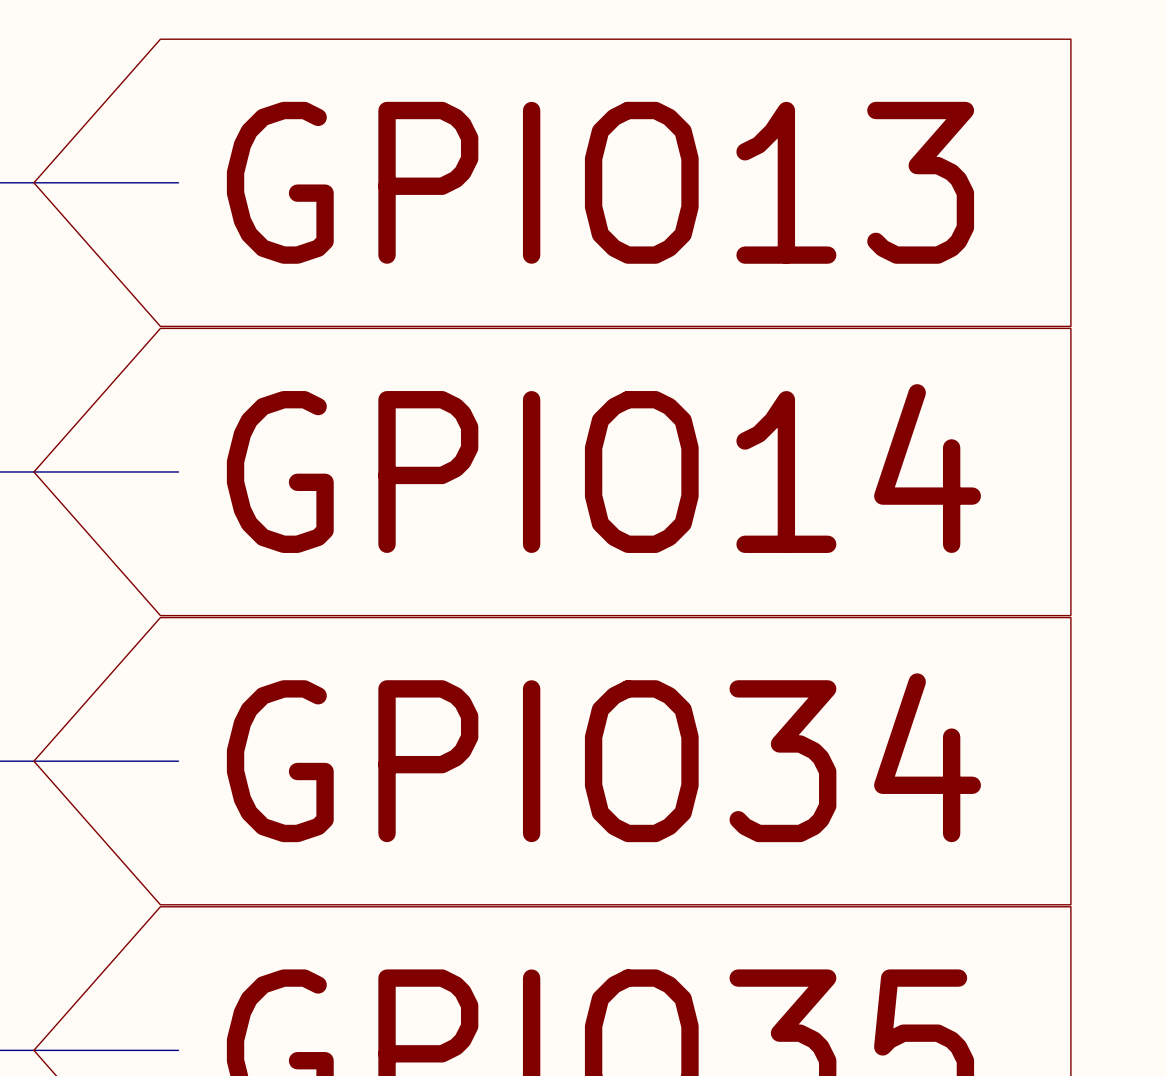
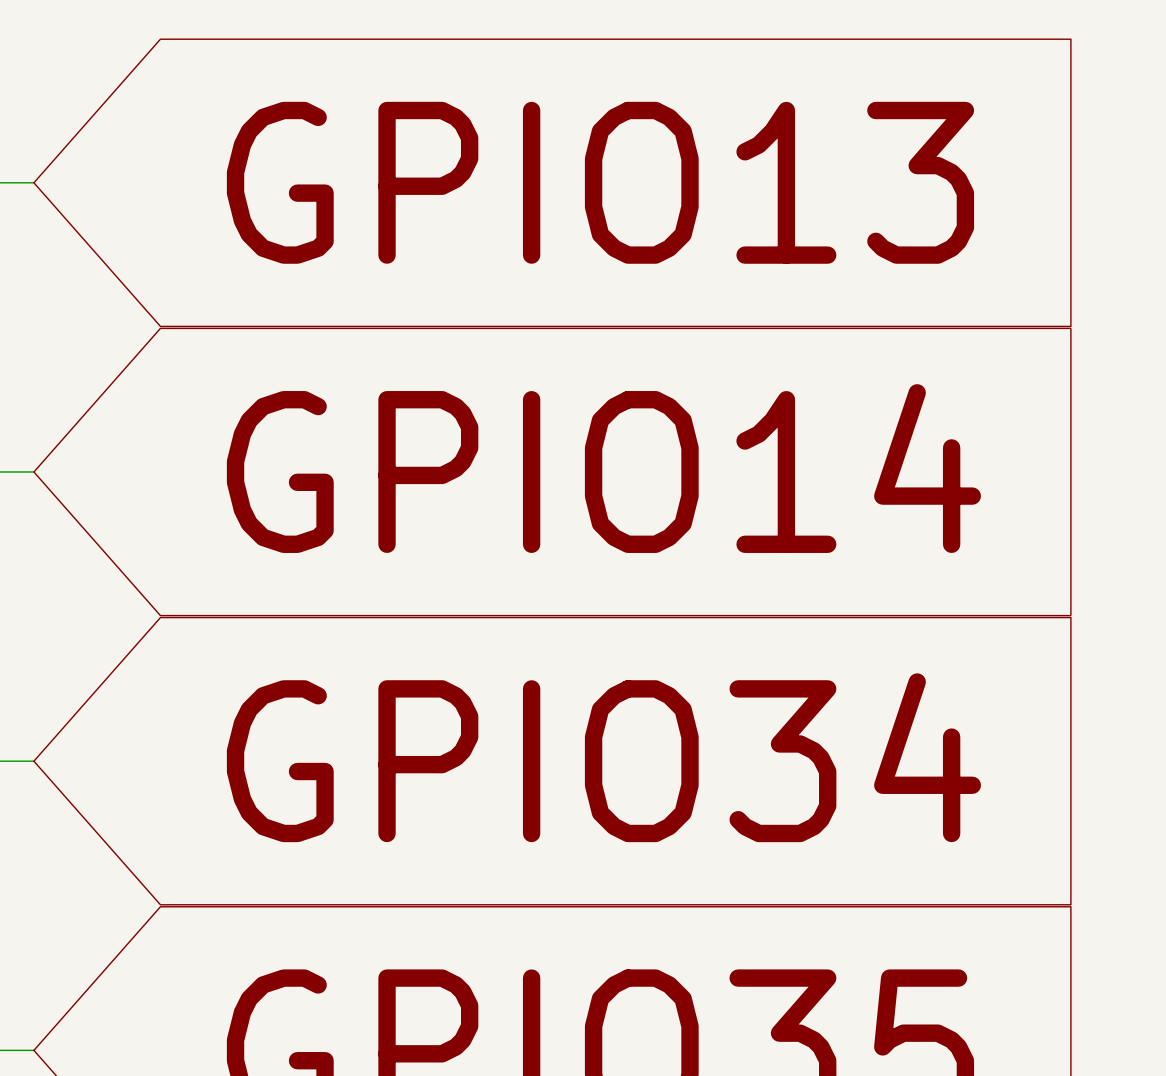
wire: (33, 182) (178, 182) -> none
wire: (33, 471) (178, 471) -> none
wire: (33, 761) (178, 761) -> none
wire: (33, 1050) (178, 1050) -> none

